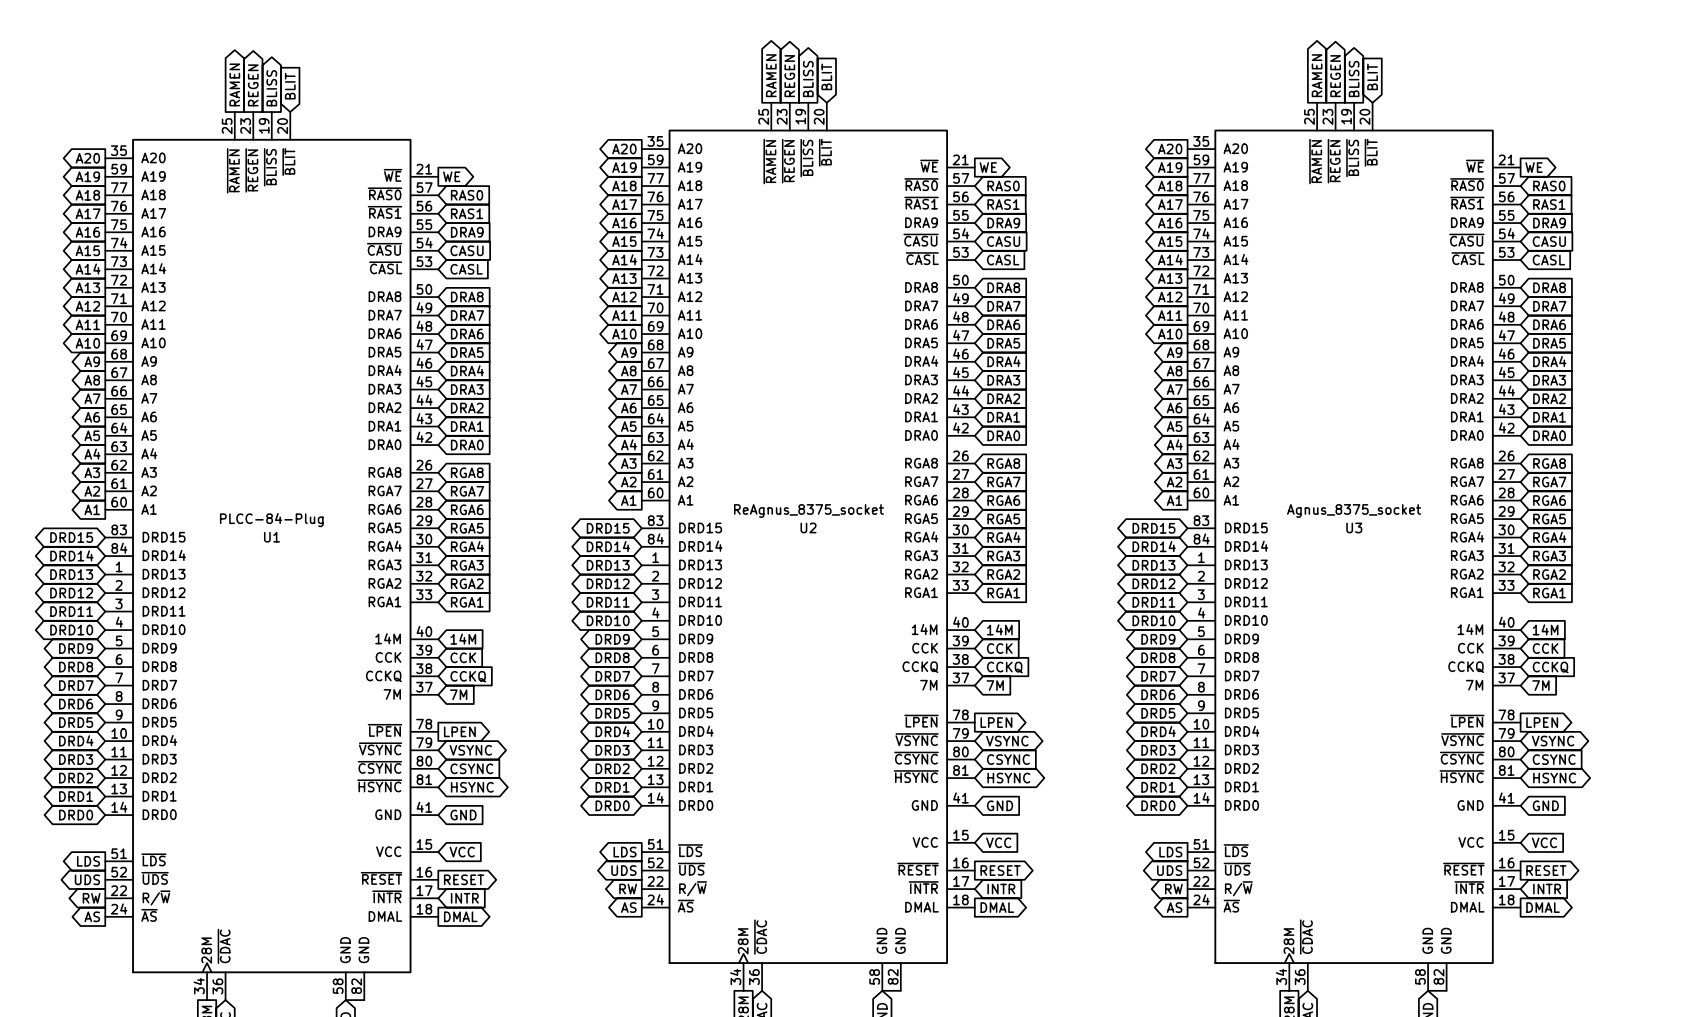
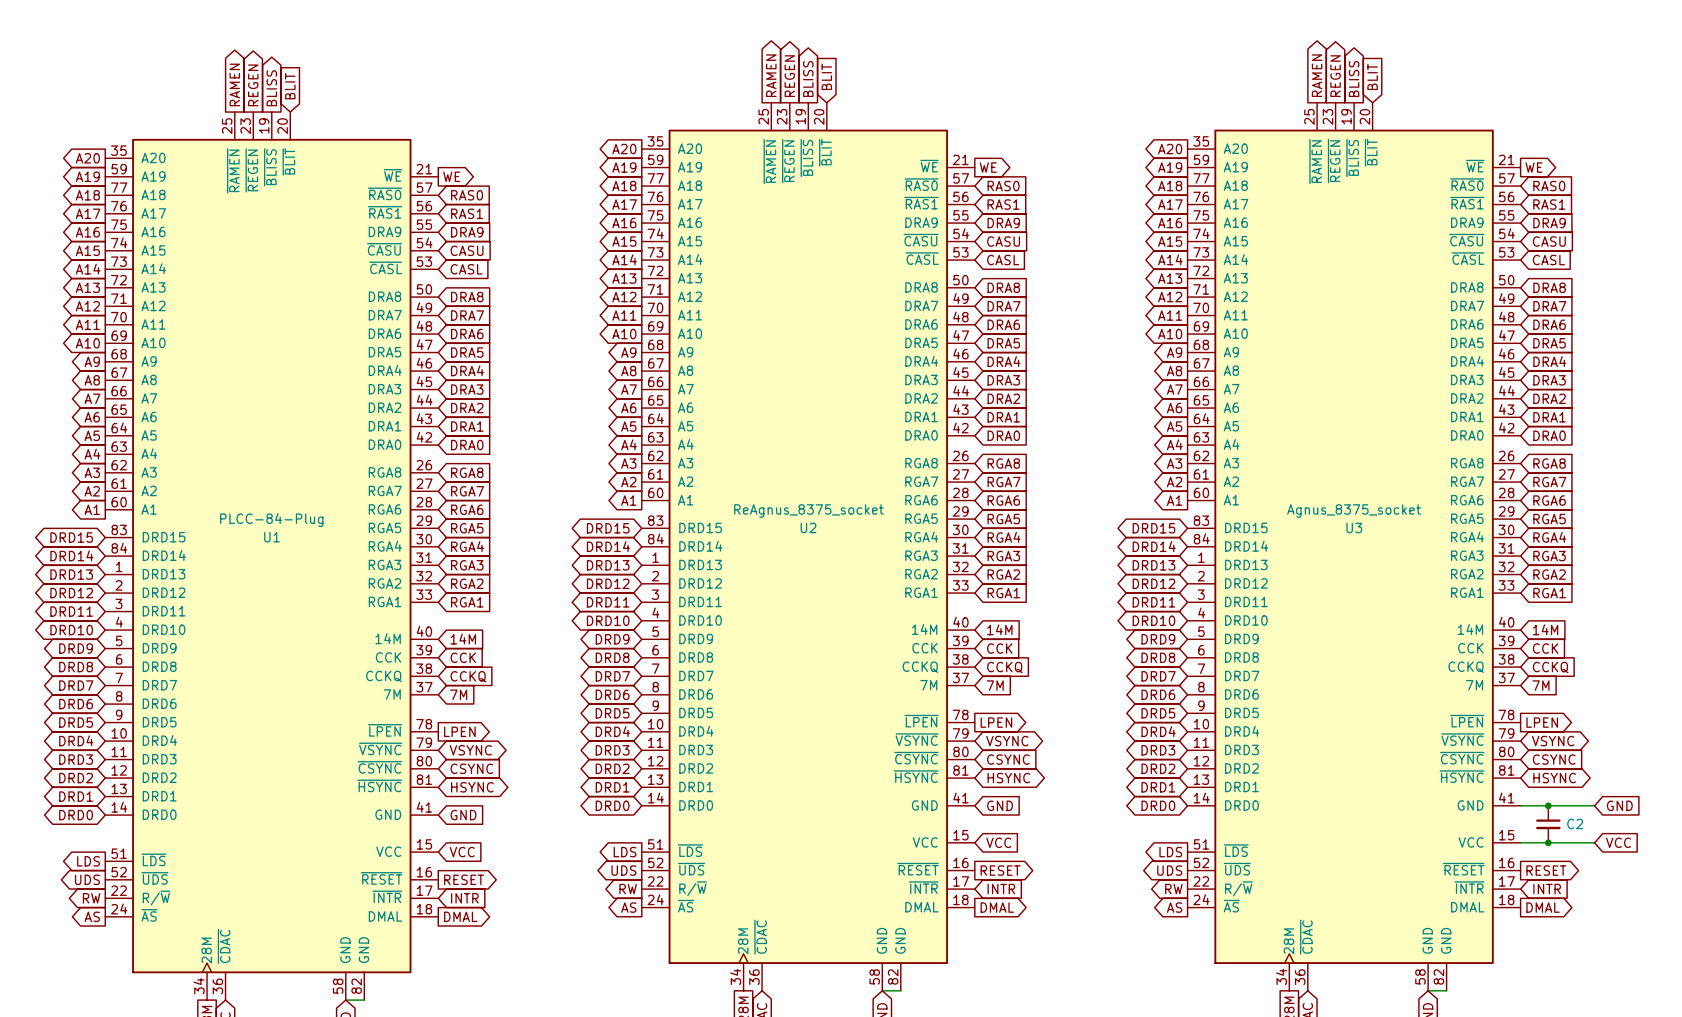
wire: none -> (1520, 805) (1594, 805)
global label position: GND (1545, 805) -> GND (1619, 805)
junction: none -> (1548, 805)
C2: none -> (1548, 824)
wire: none -> (1520, 842) (1594, 842)
global label position: VCC (1544, 842) -> VCC (1618, 842)
junction: none -> (1548, 842)

